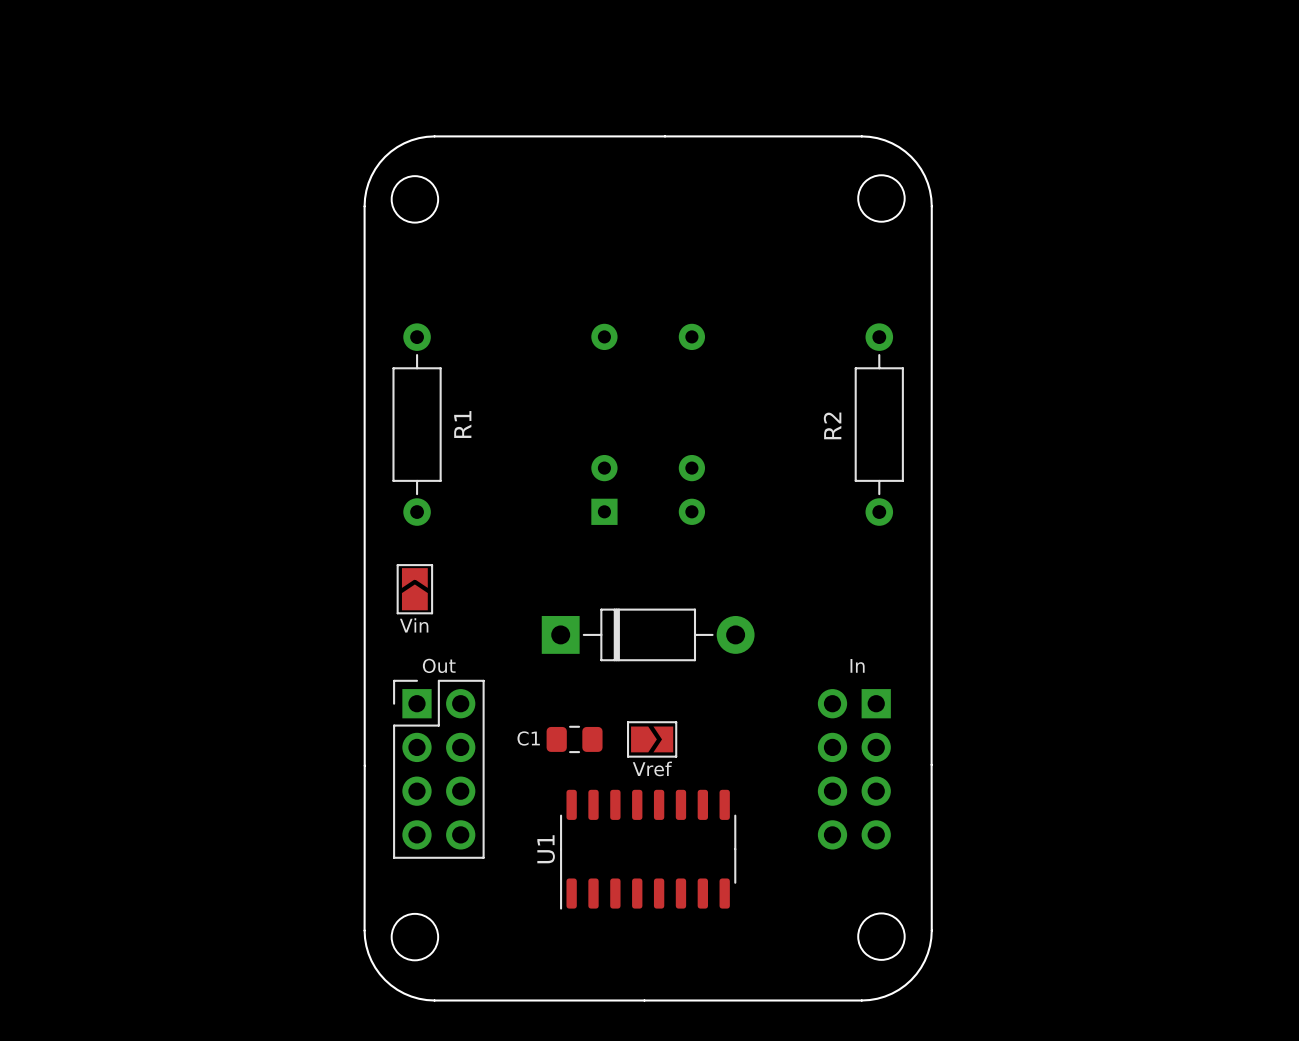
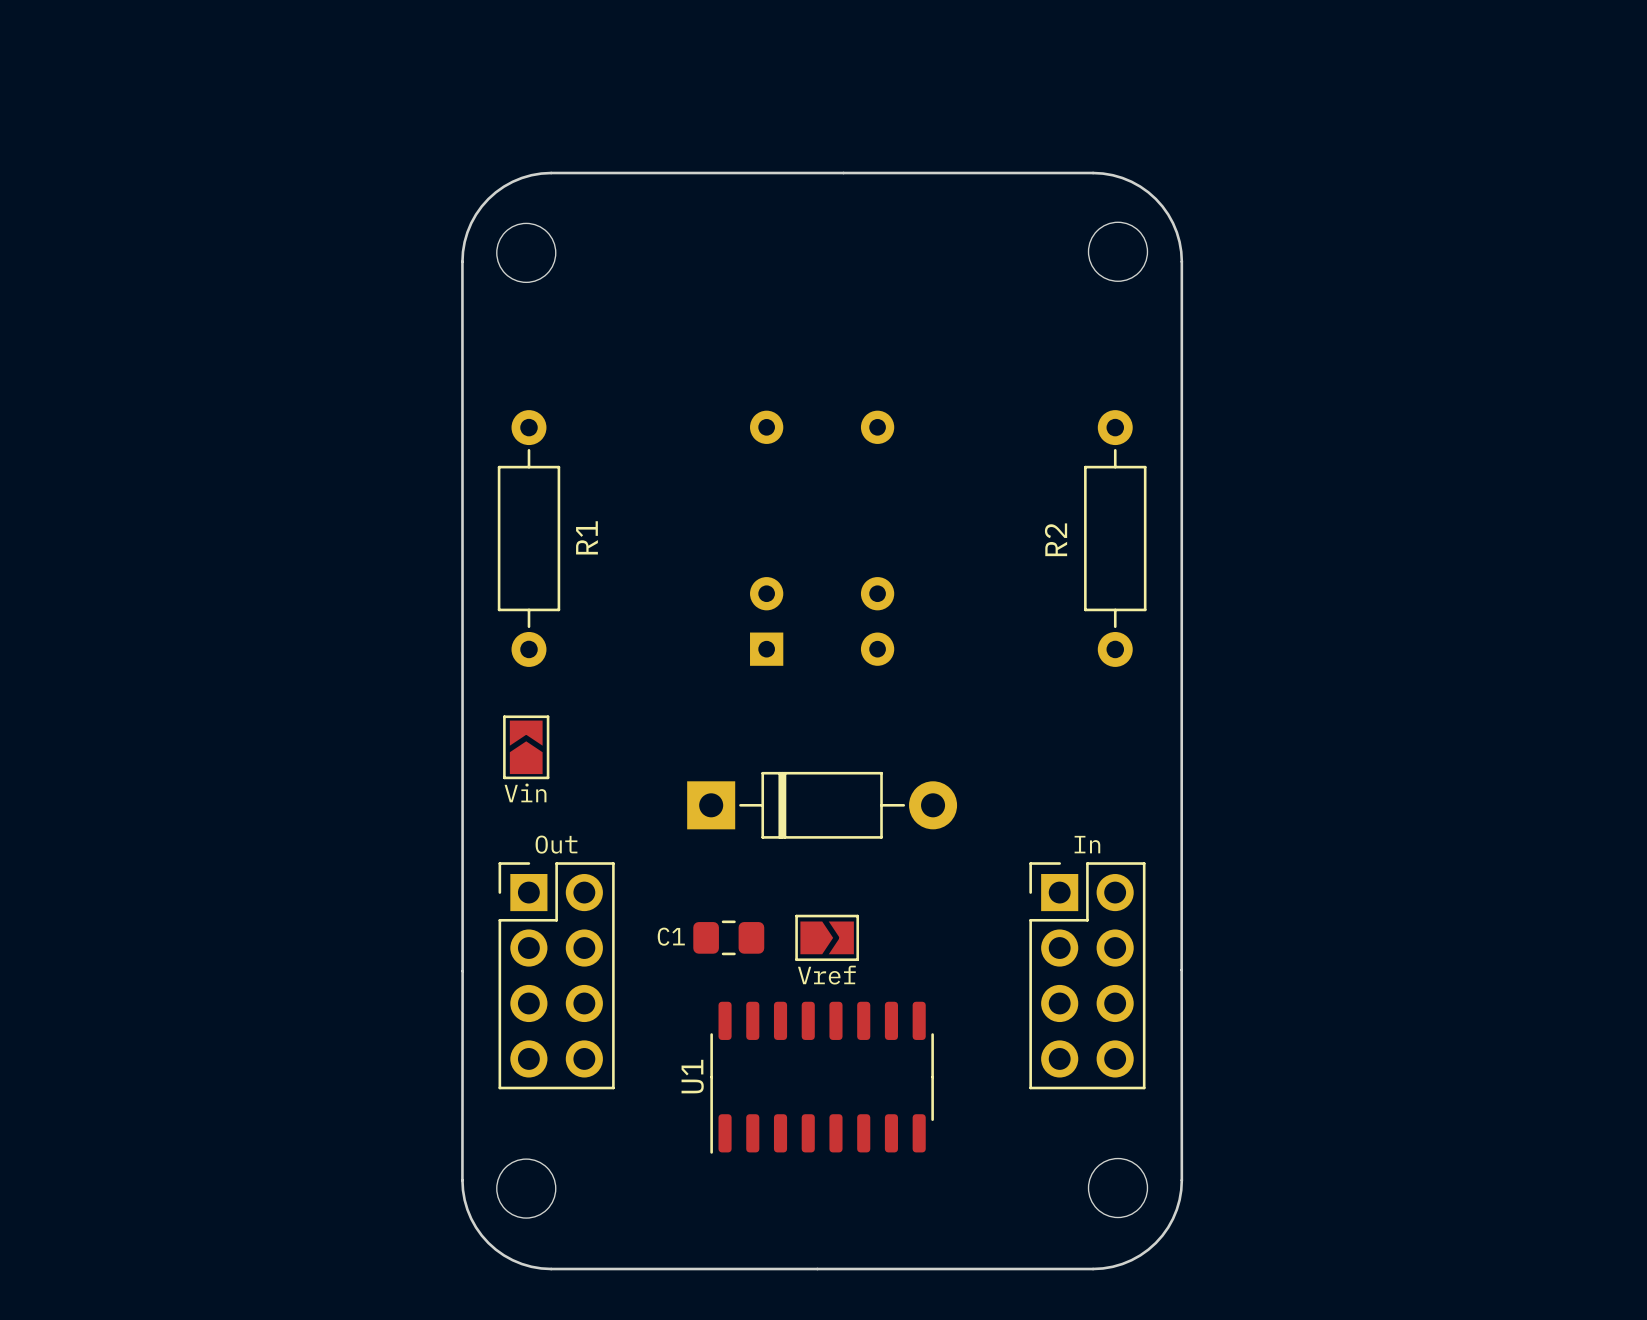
part side: bottom (854, 769) -> top (1087, 975)

